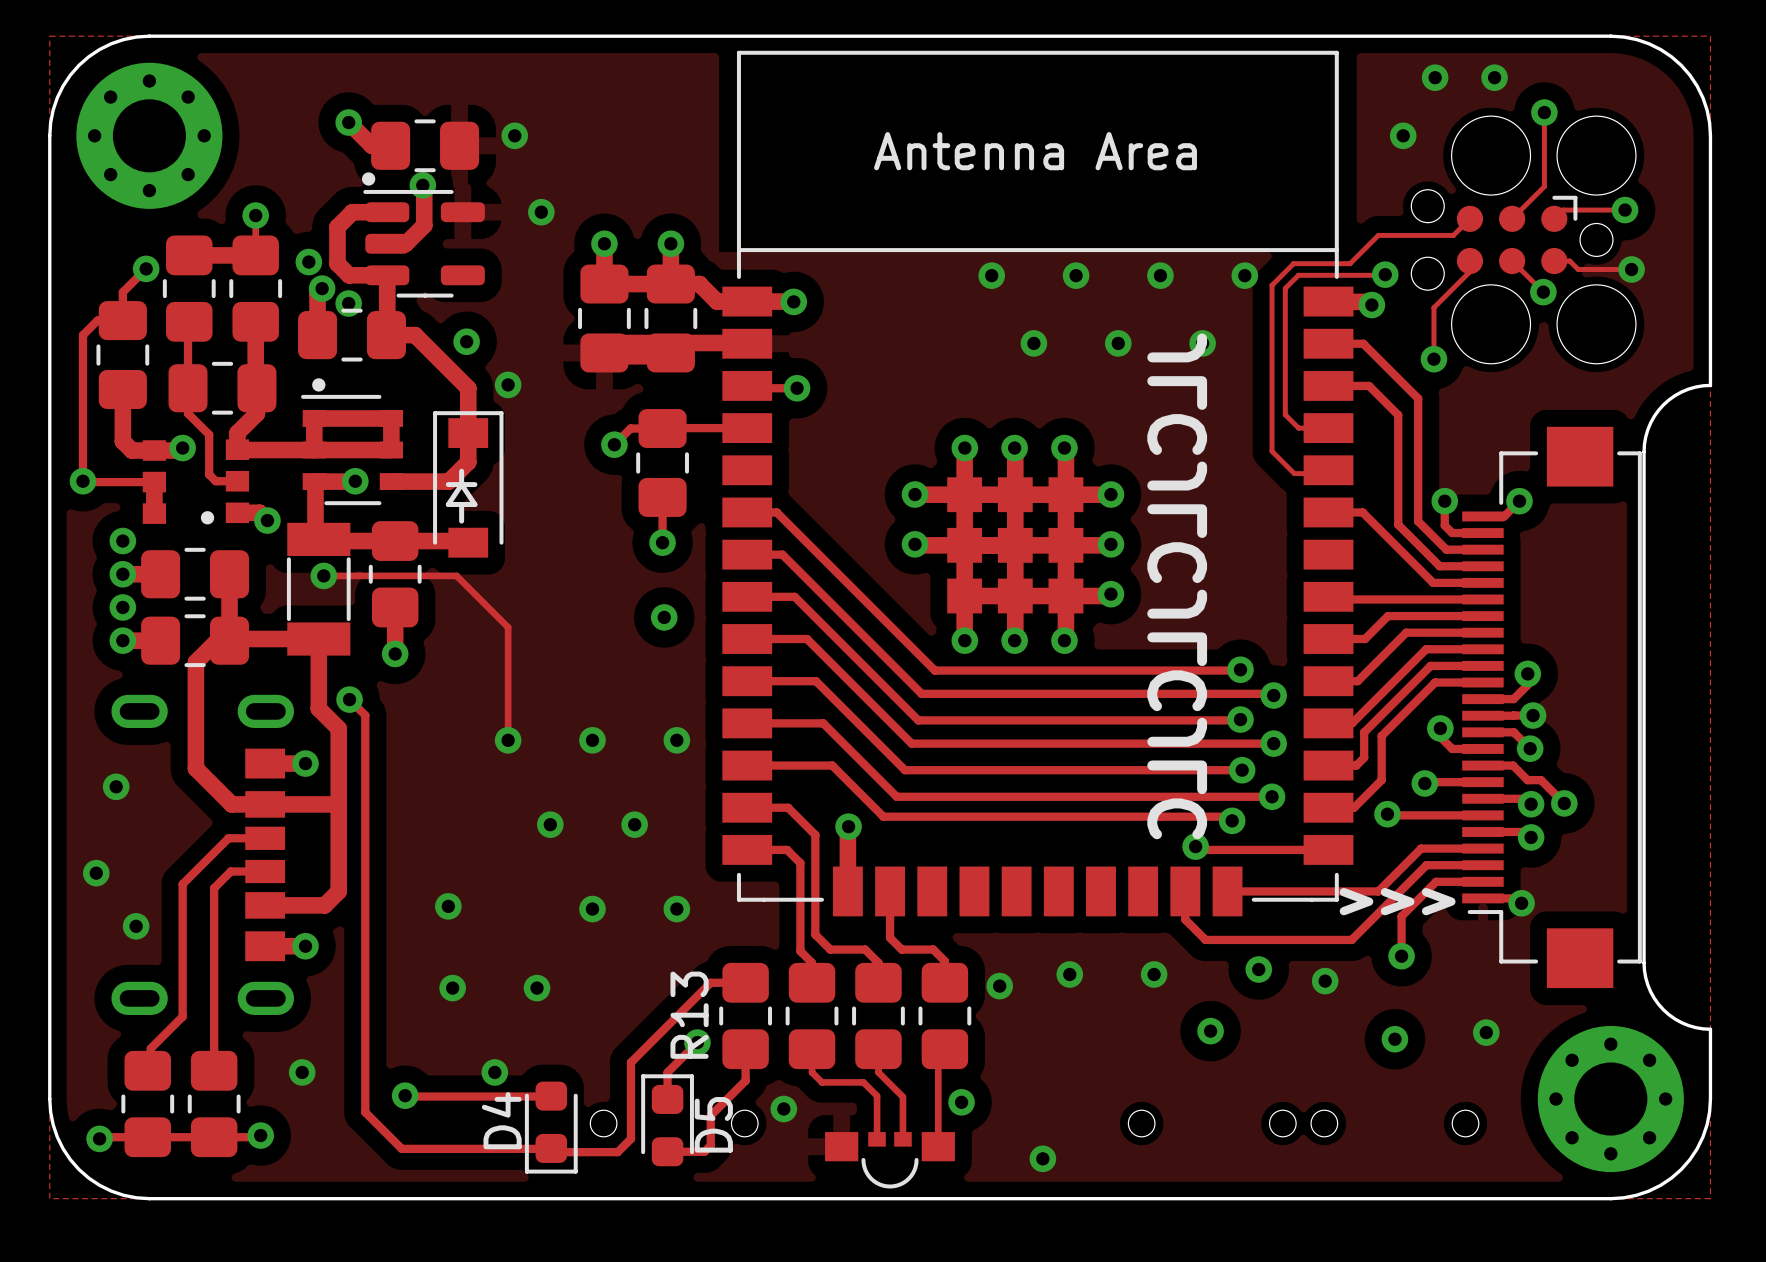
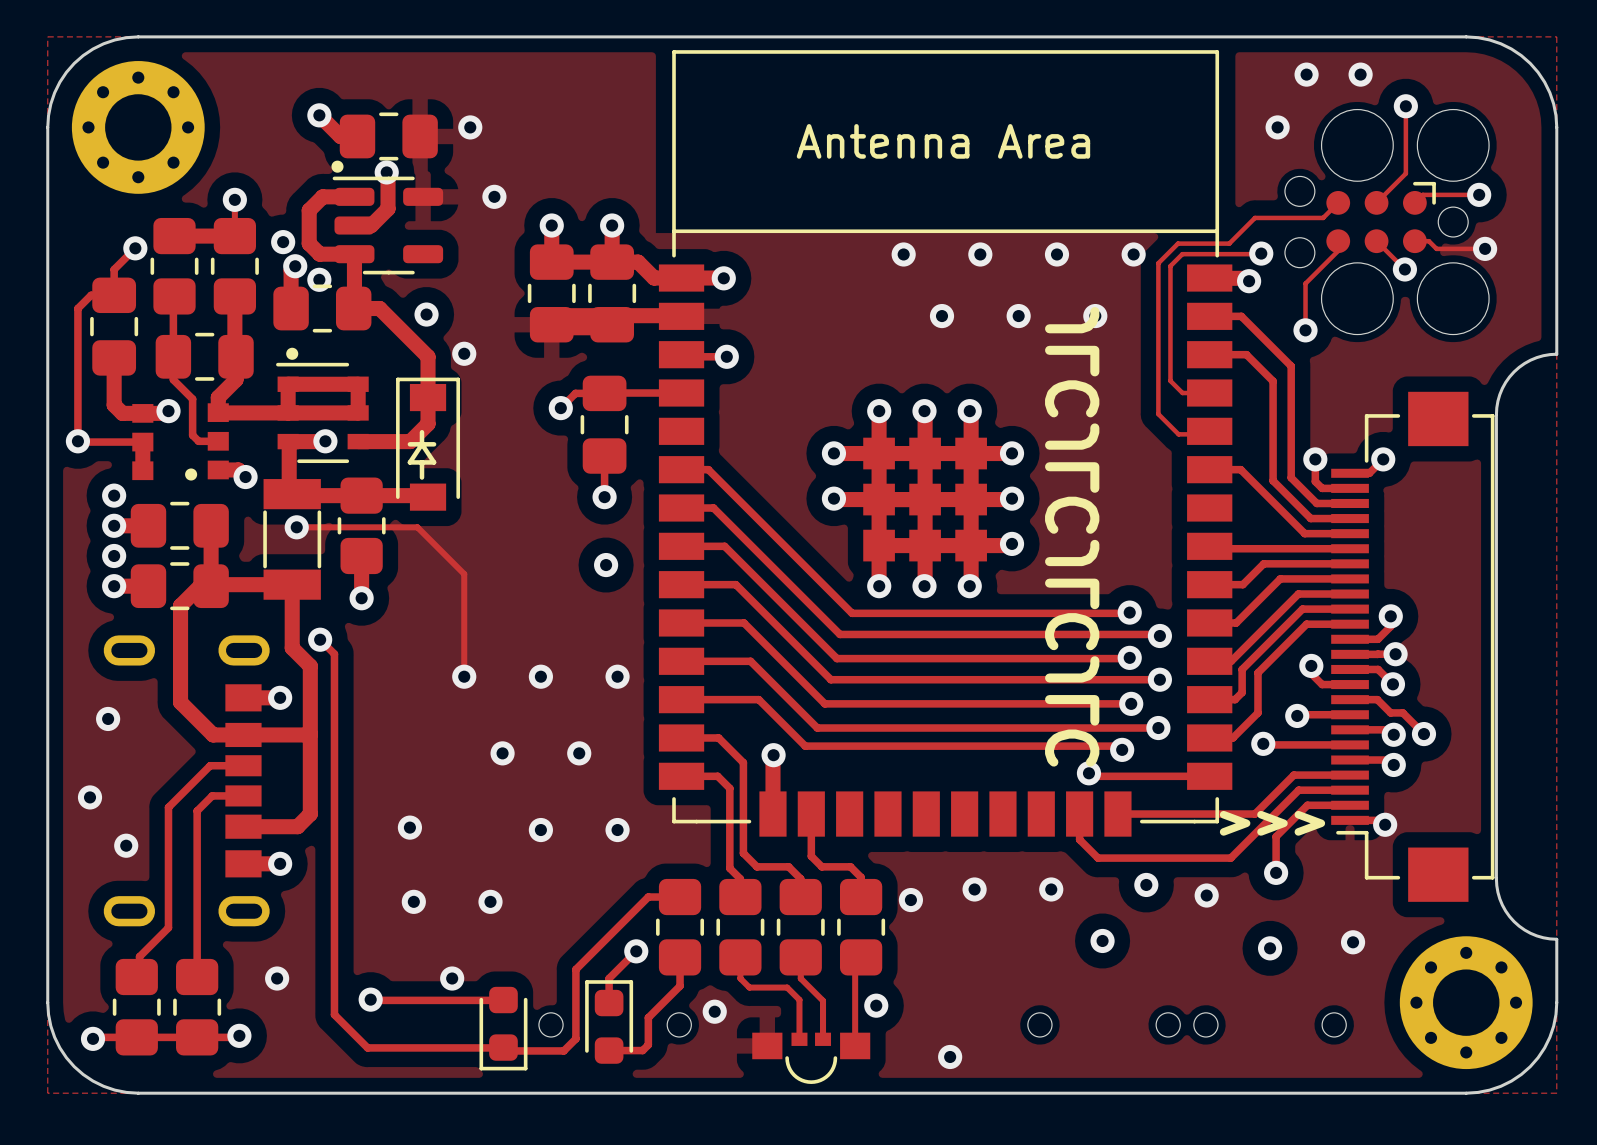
R13 name: R13 (689, 1015) -> none
D4 name: D4 (501, 1120) -> none
D5 name: D5 (713, 1124) -> none

